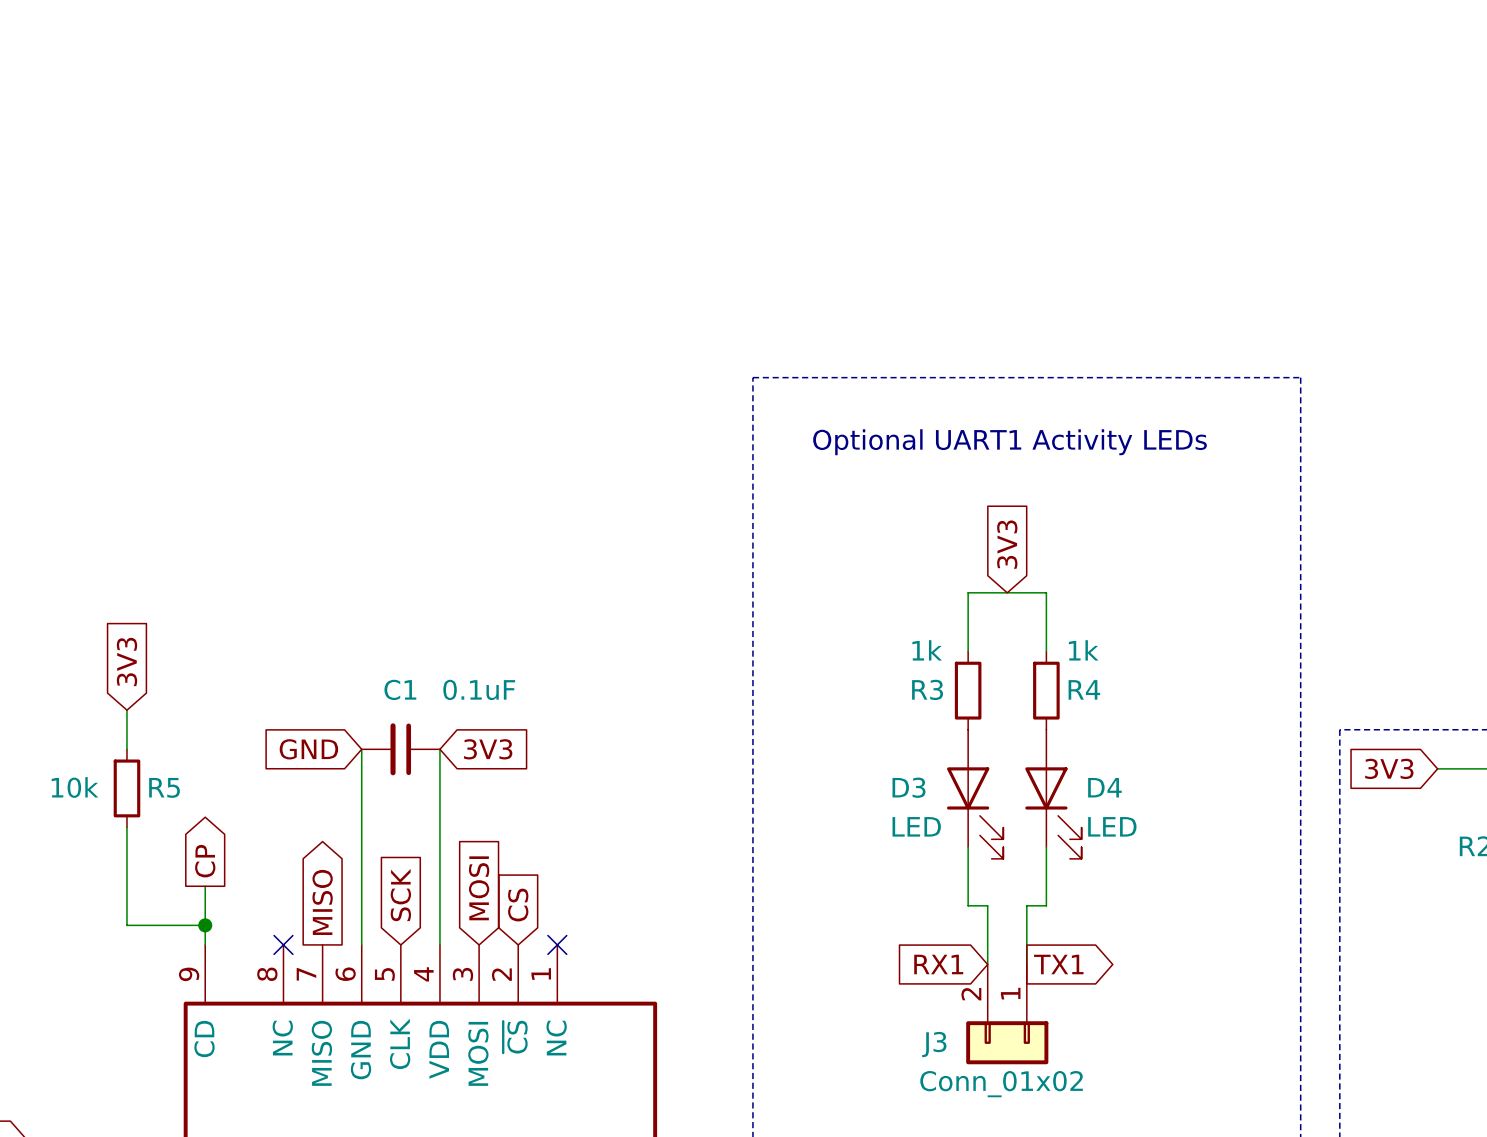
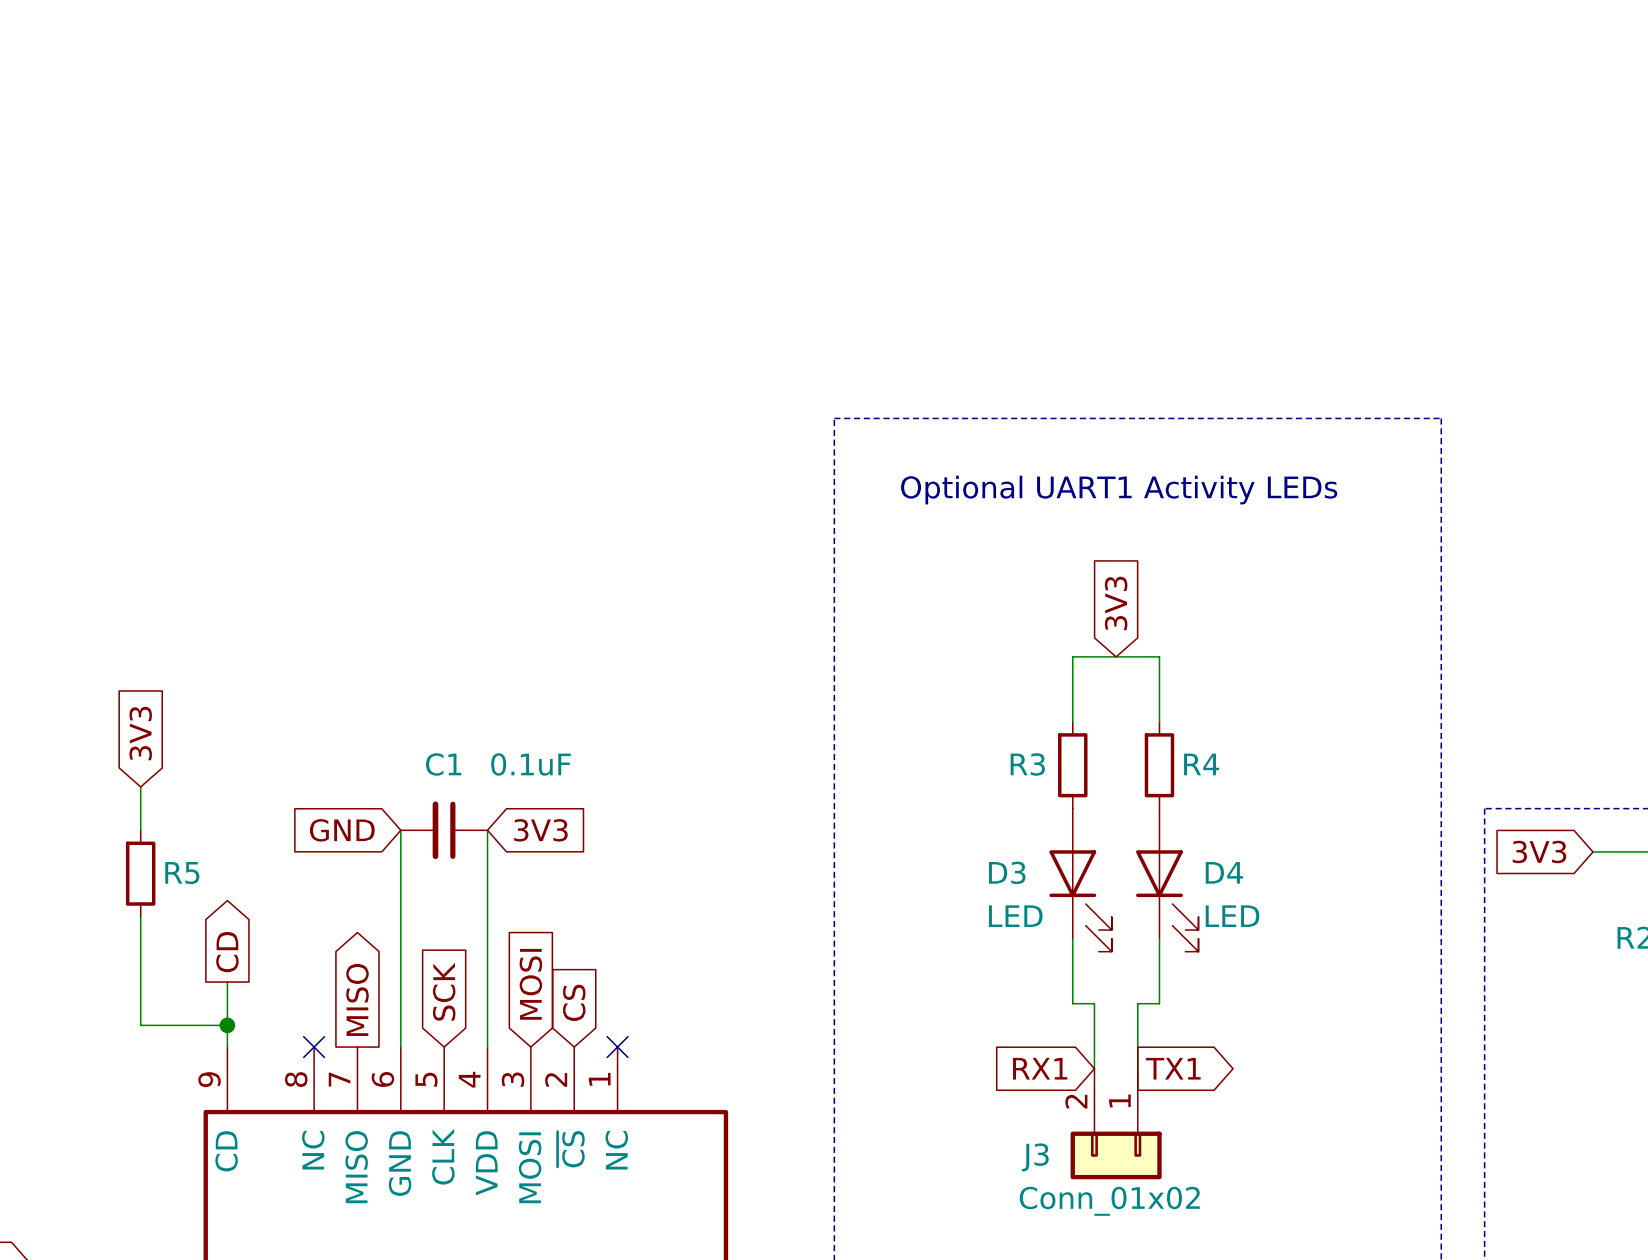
R3 value: 1k (927, 650) -> none
R4 value: 1k (1083, 650) -> none
R5 value: 10k (75, 787) -> none
global label: CP (205, 861) -> CD (227, 952)

